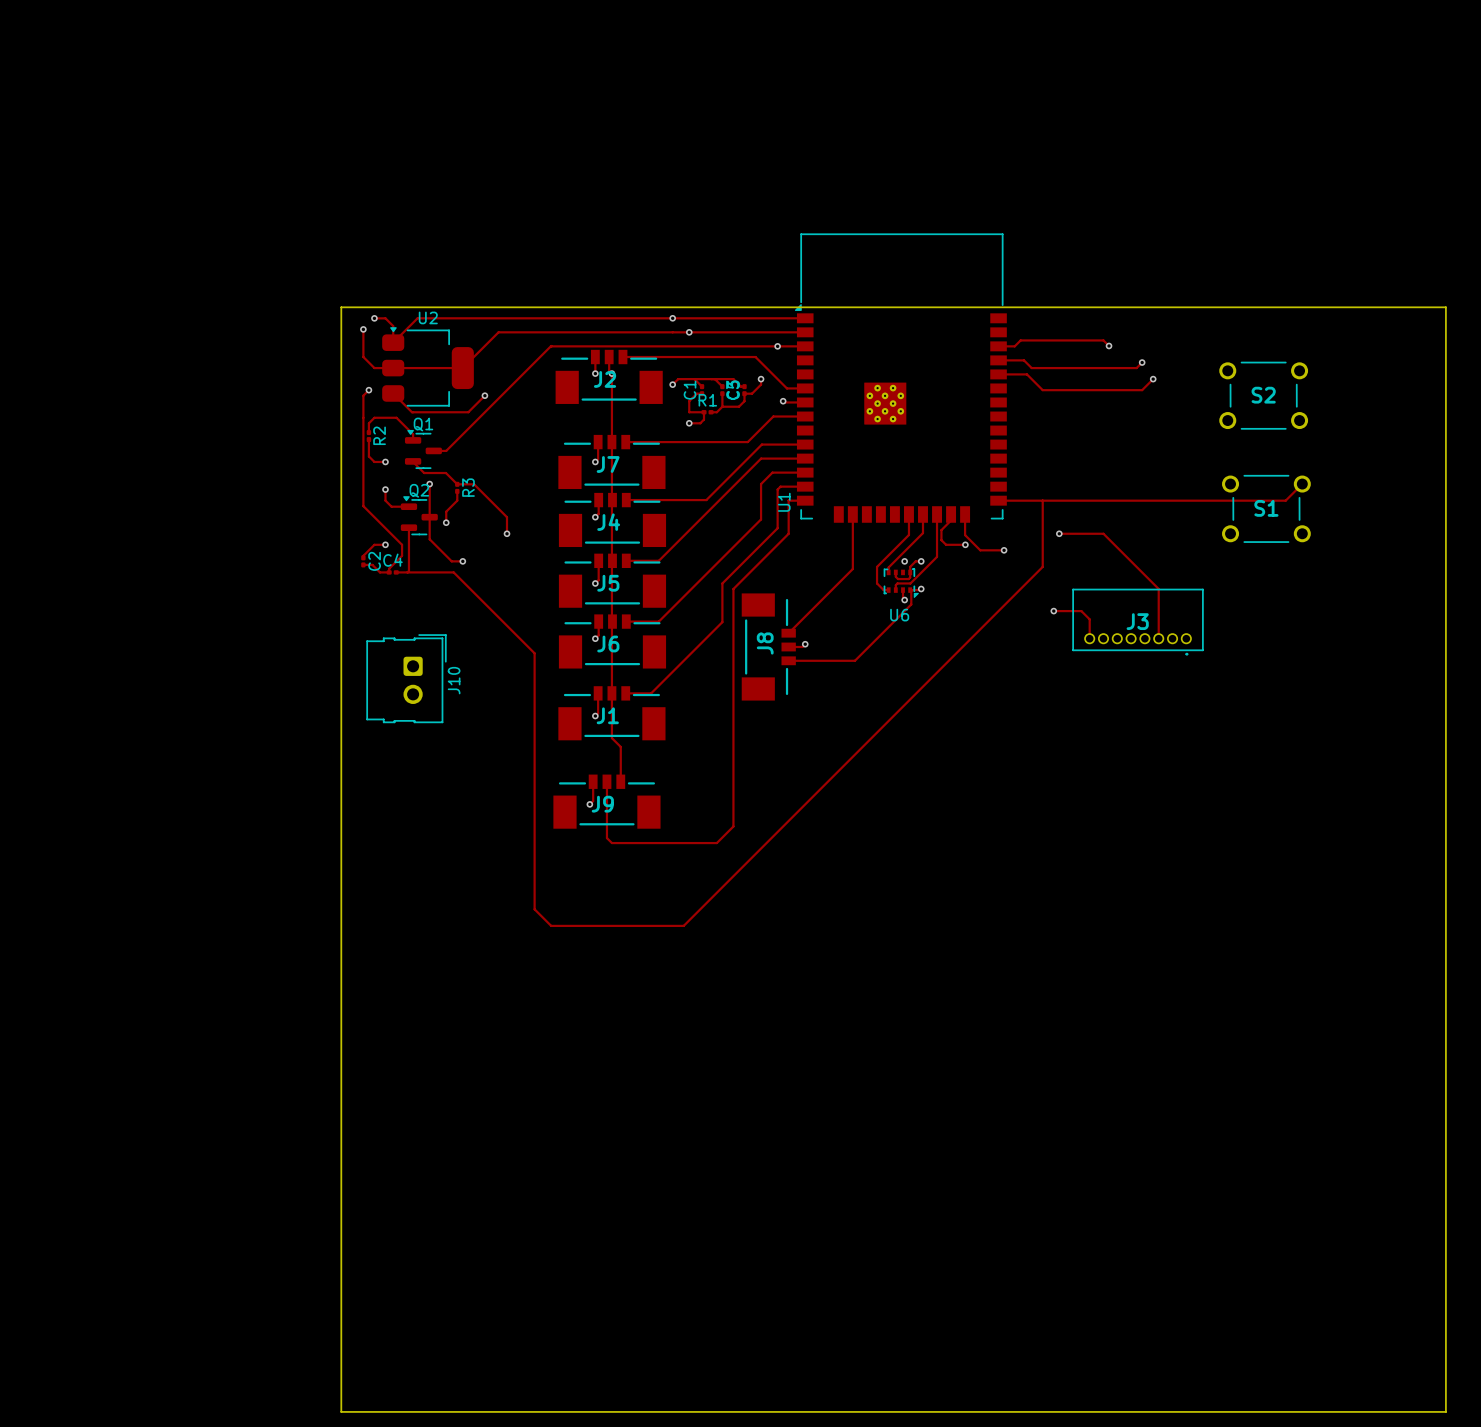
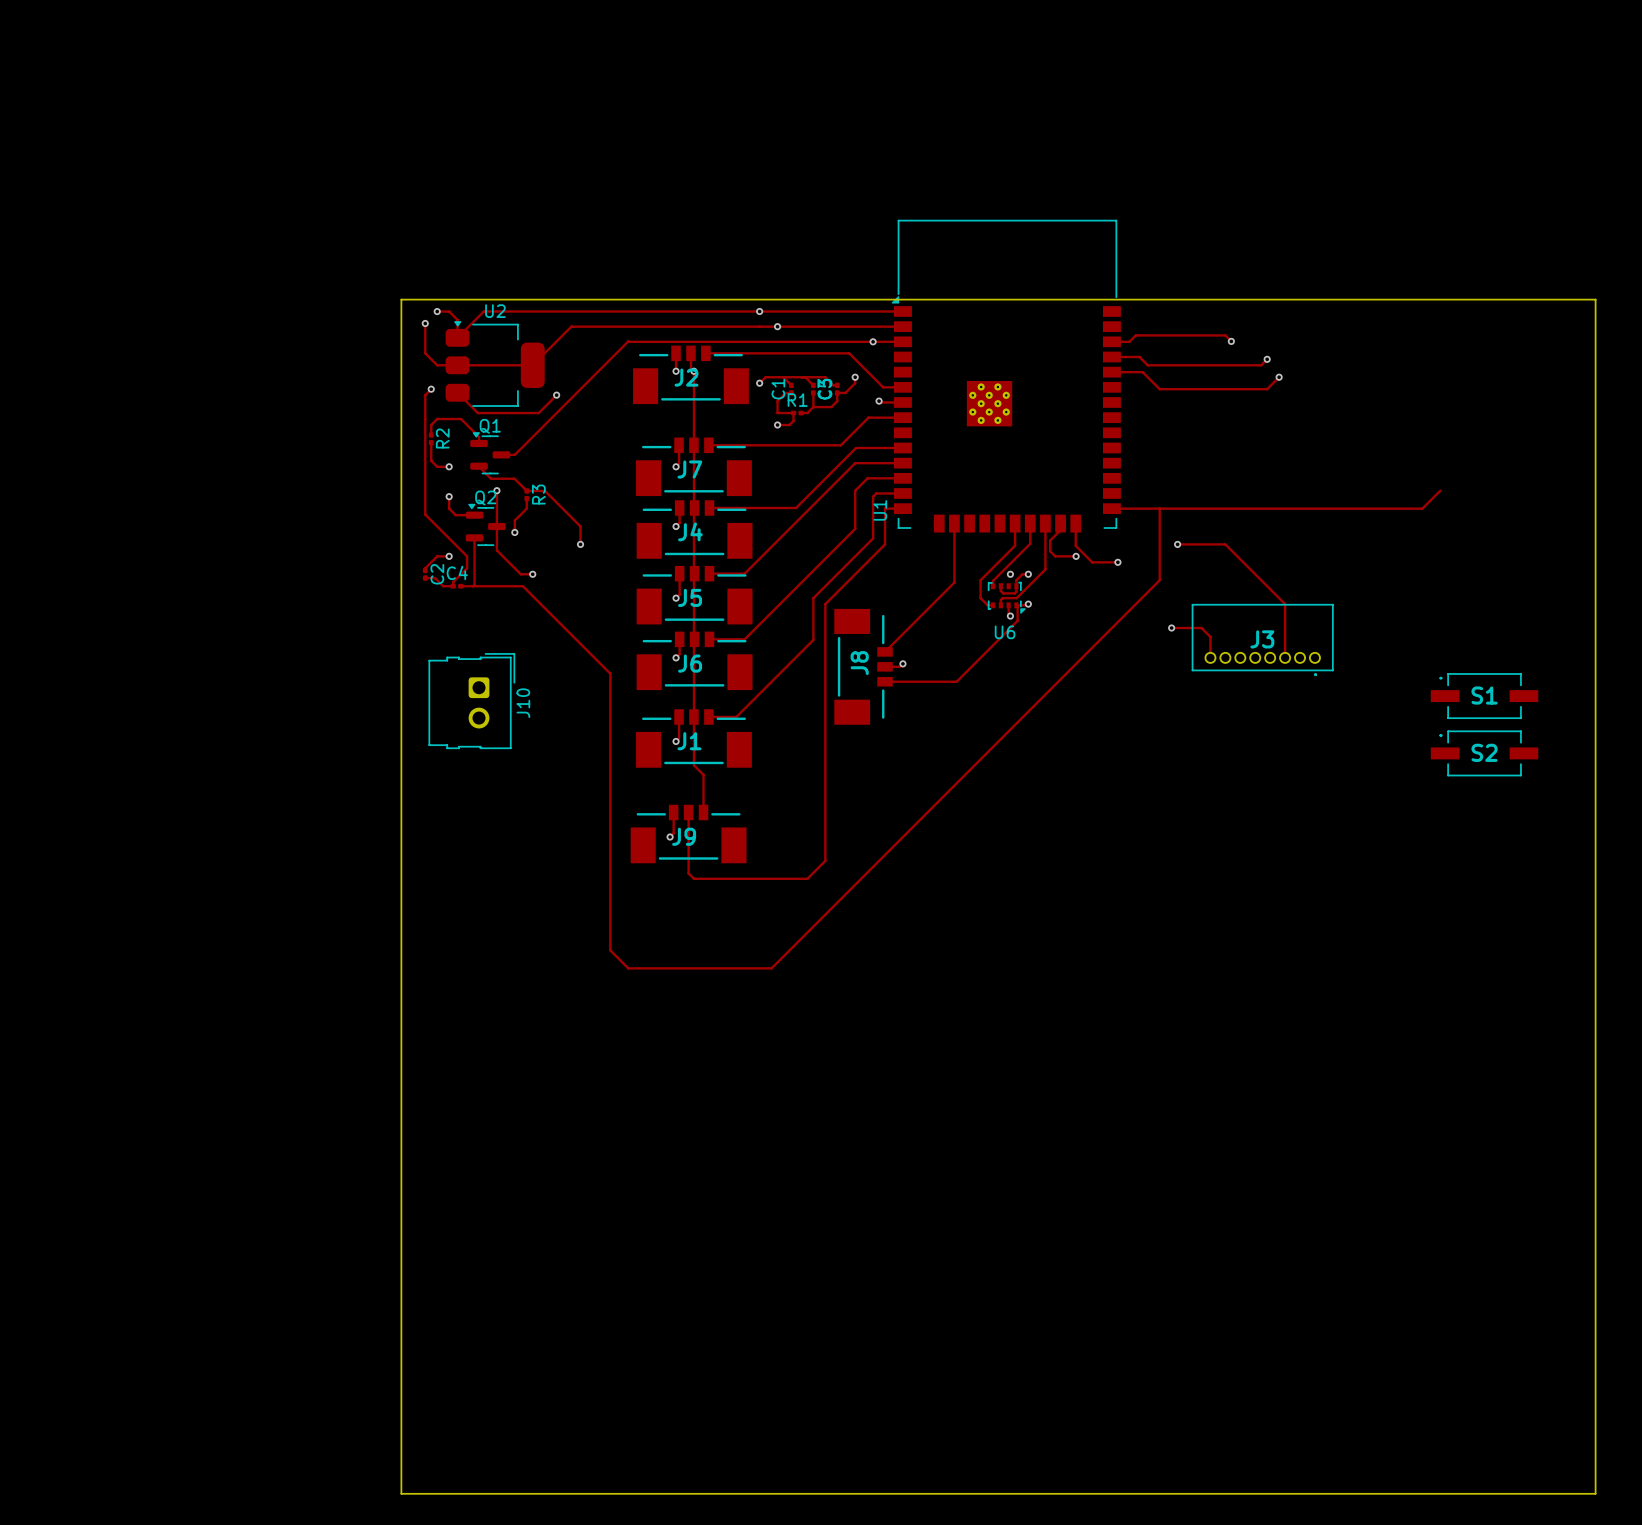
S2 footprint: [1219, 361, 1309, 430] -> [1430, 730, 1539, 777]
S1 footprint: [1222, 475, 1311, 543] -> [1430, 673, 1539, 719]

